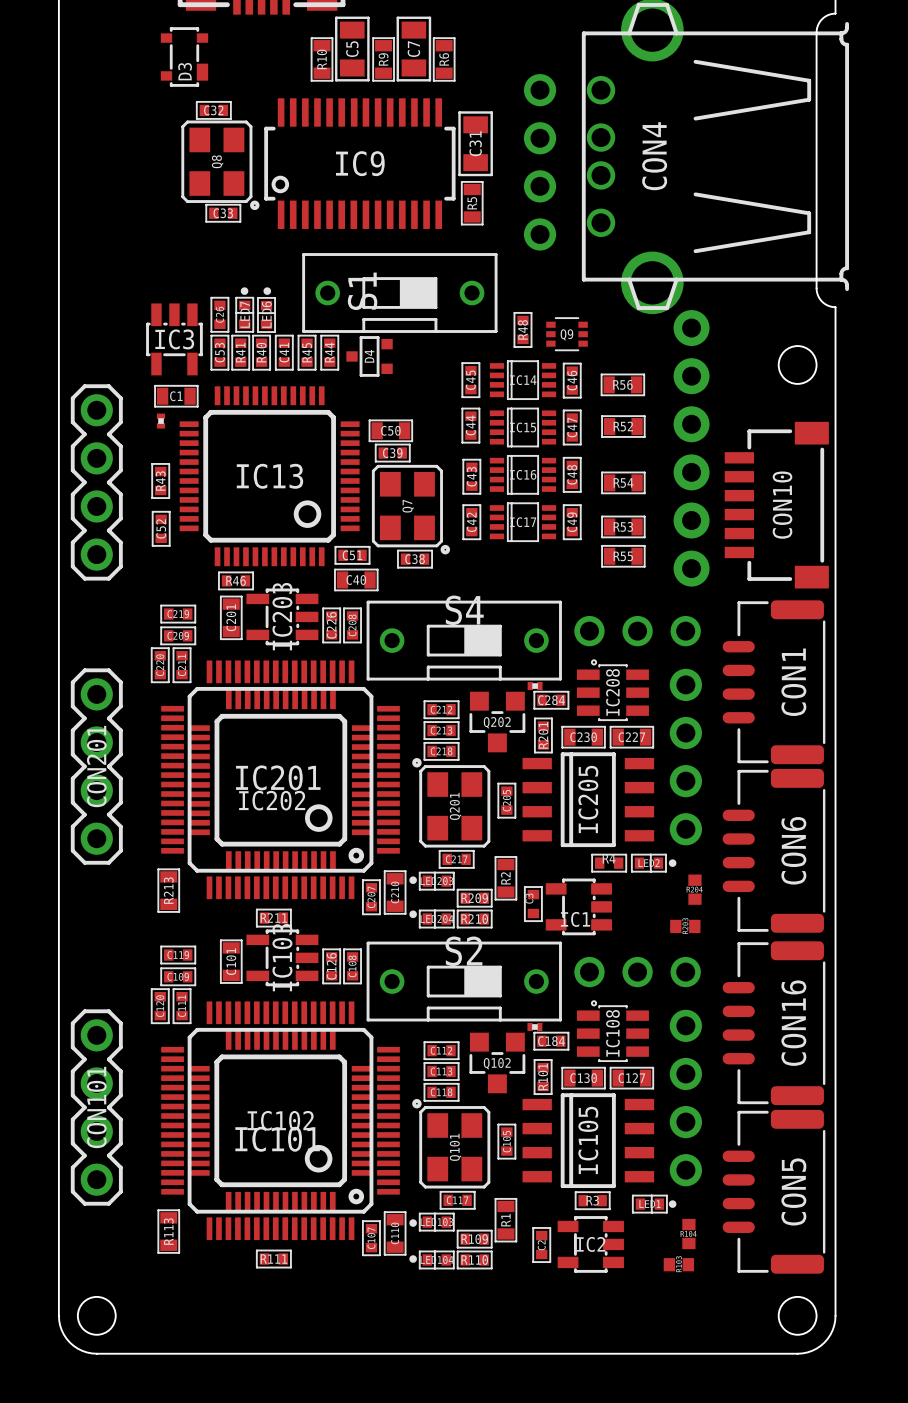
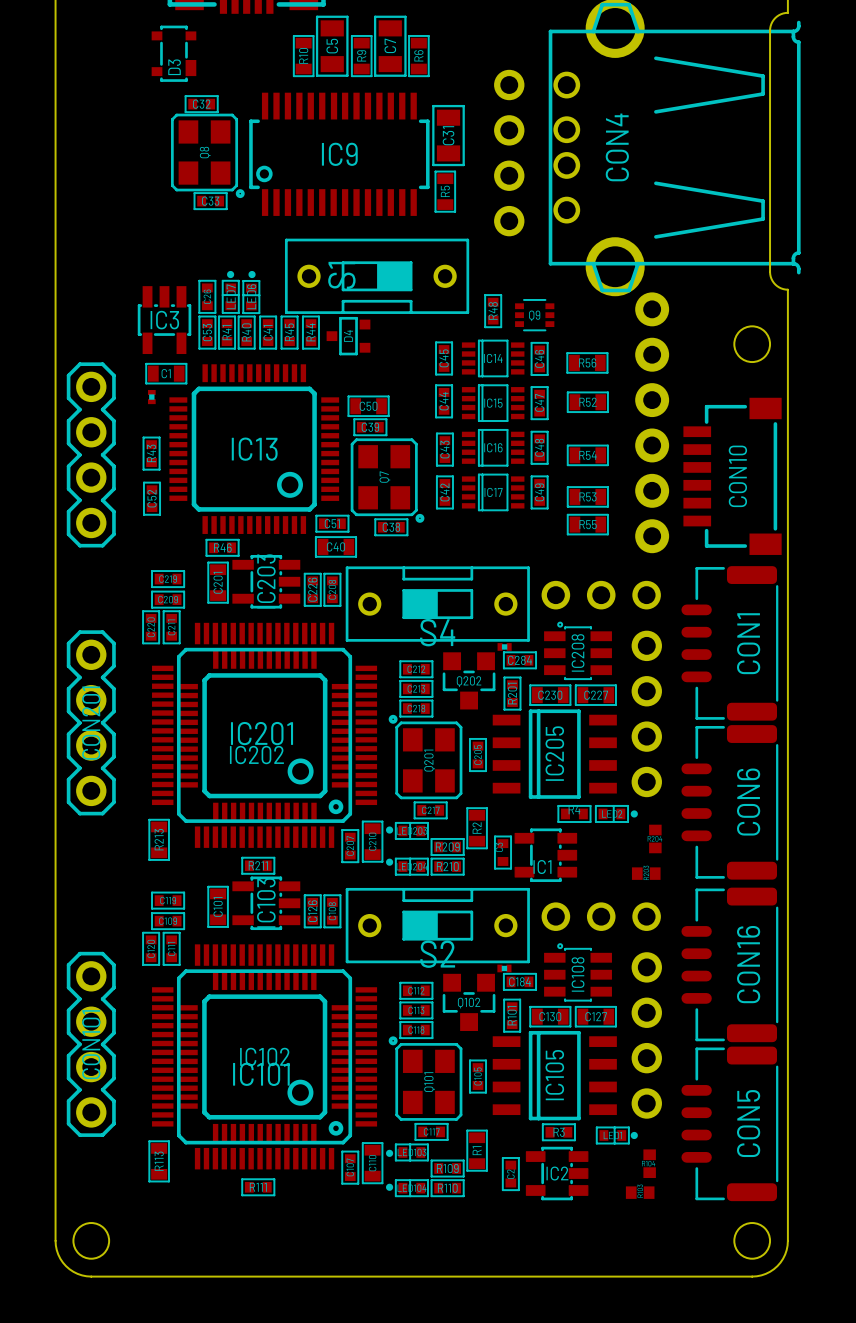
S4 rotation: 0° (464, 640) -> 180° (437, 604)
S2 rotation: 0° (464, 981) -> 180° (437, 925)

